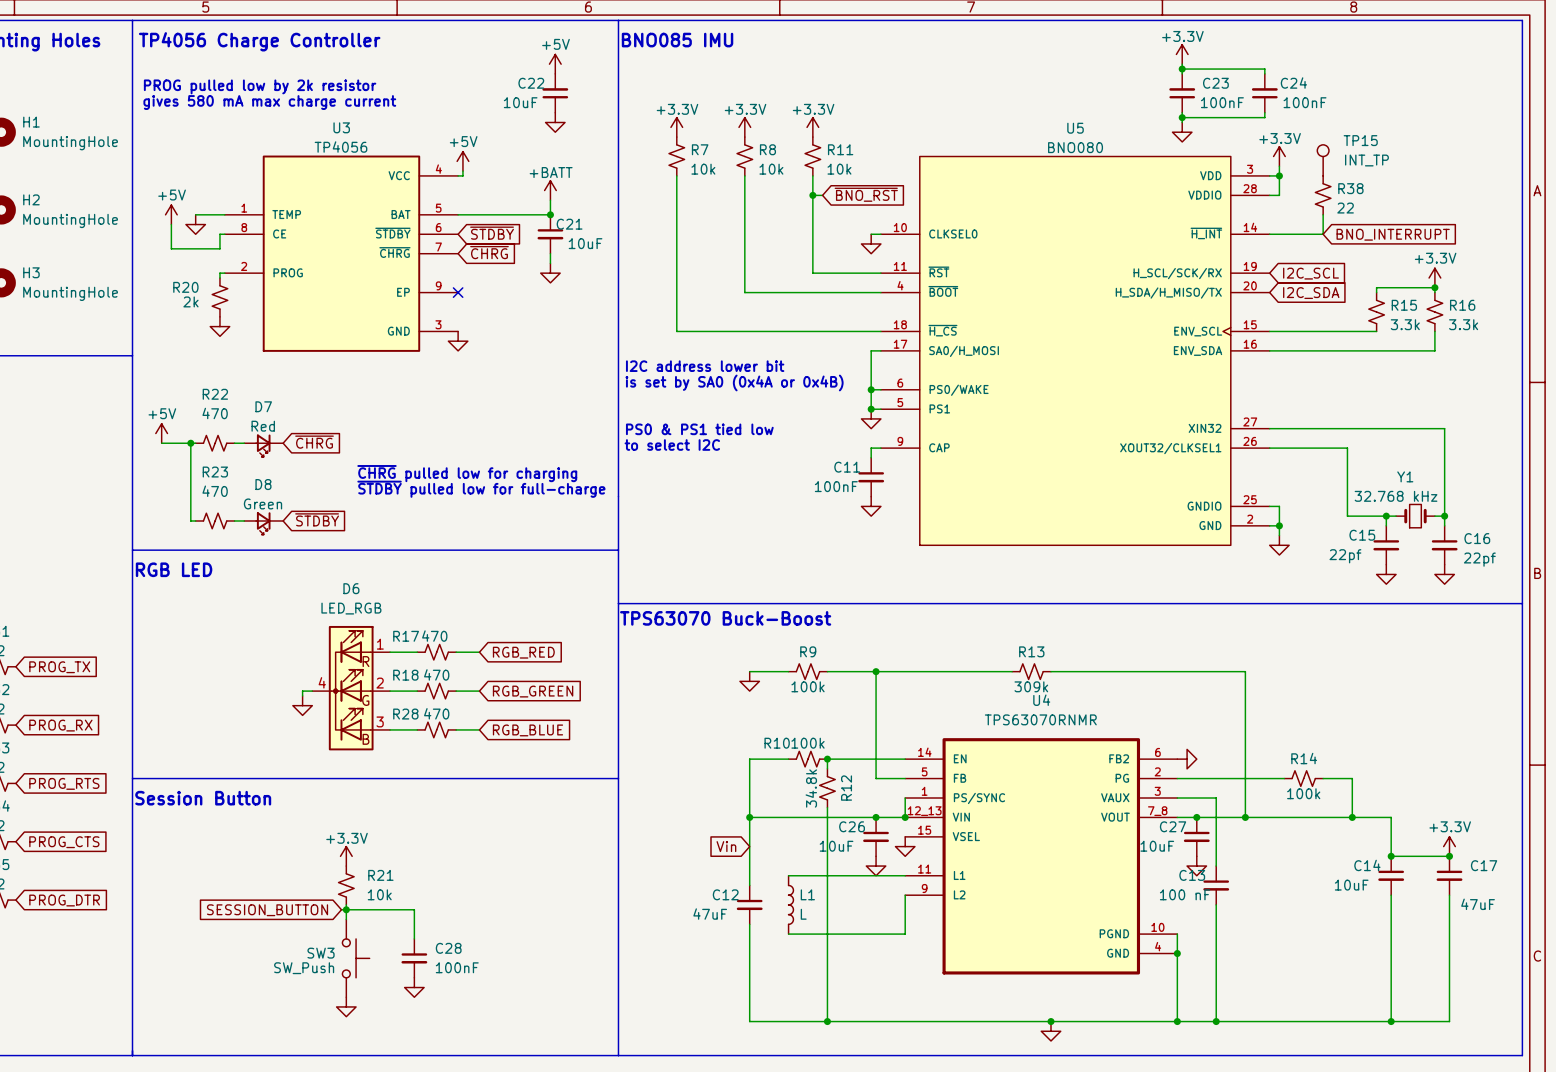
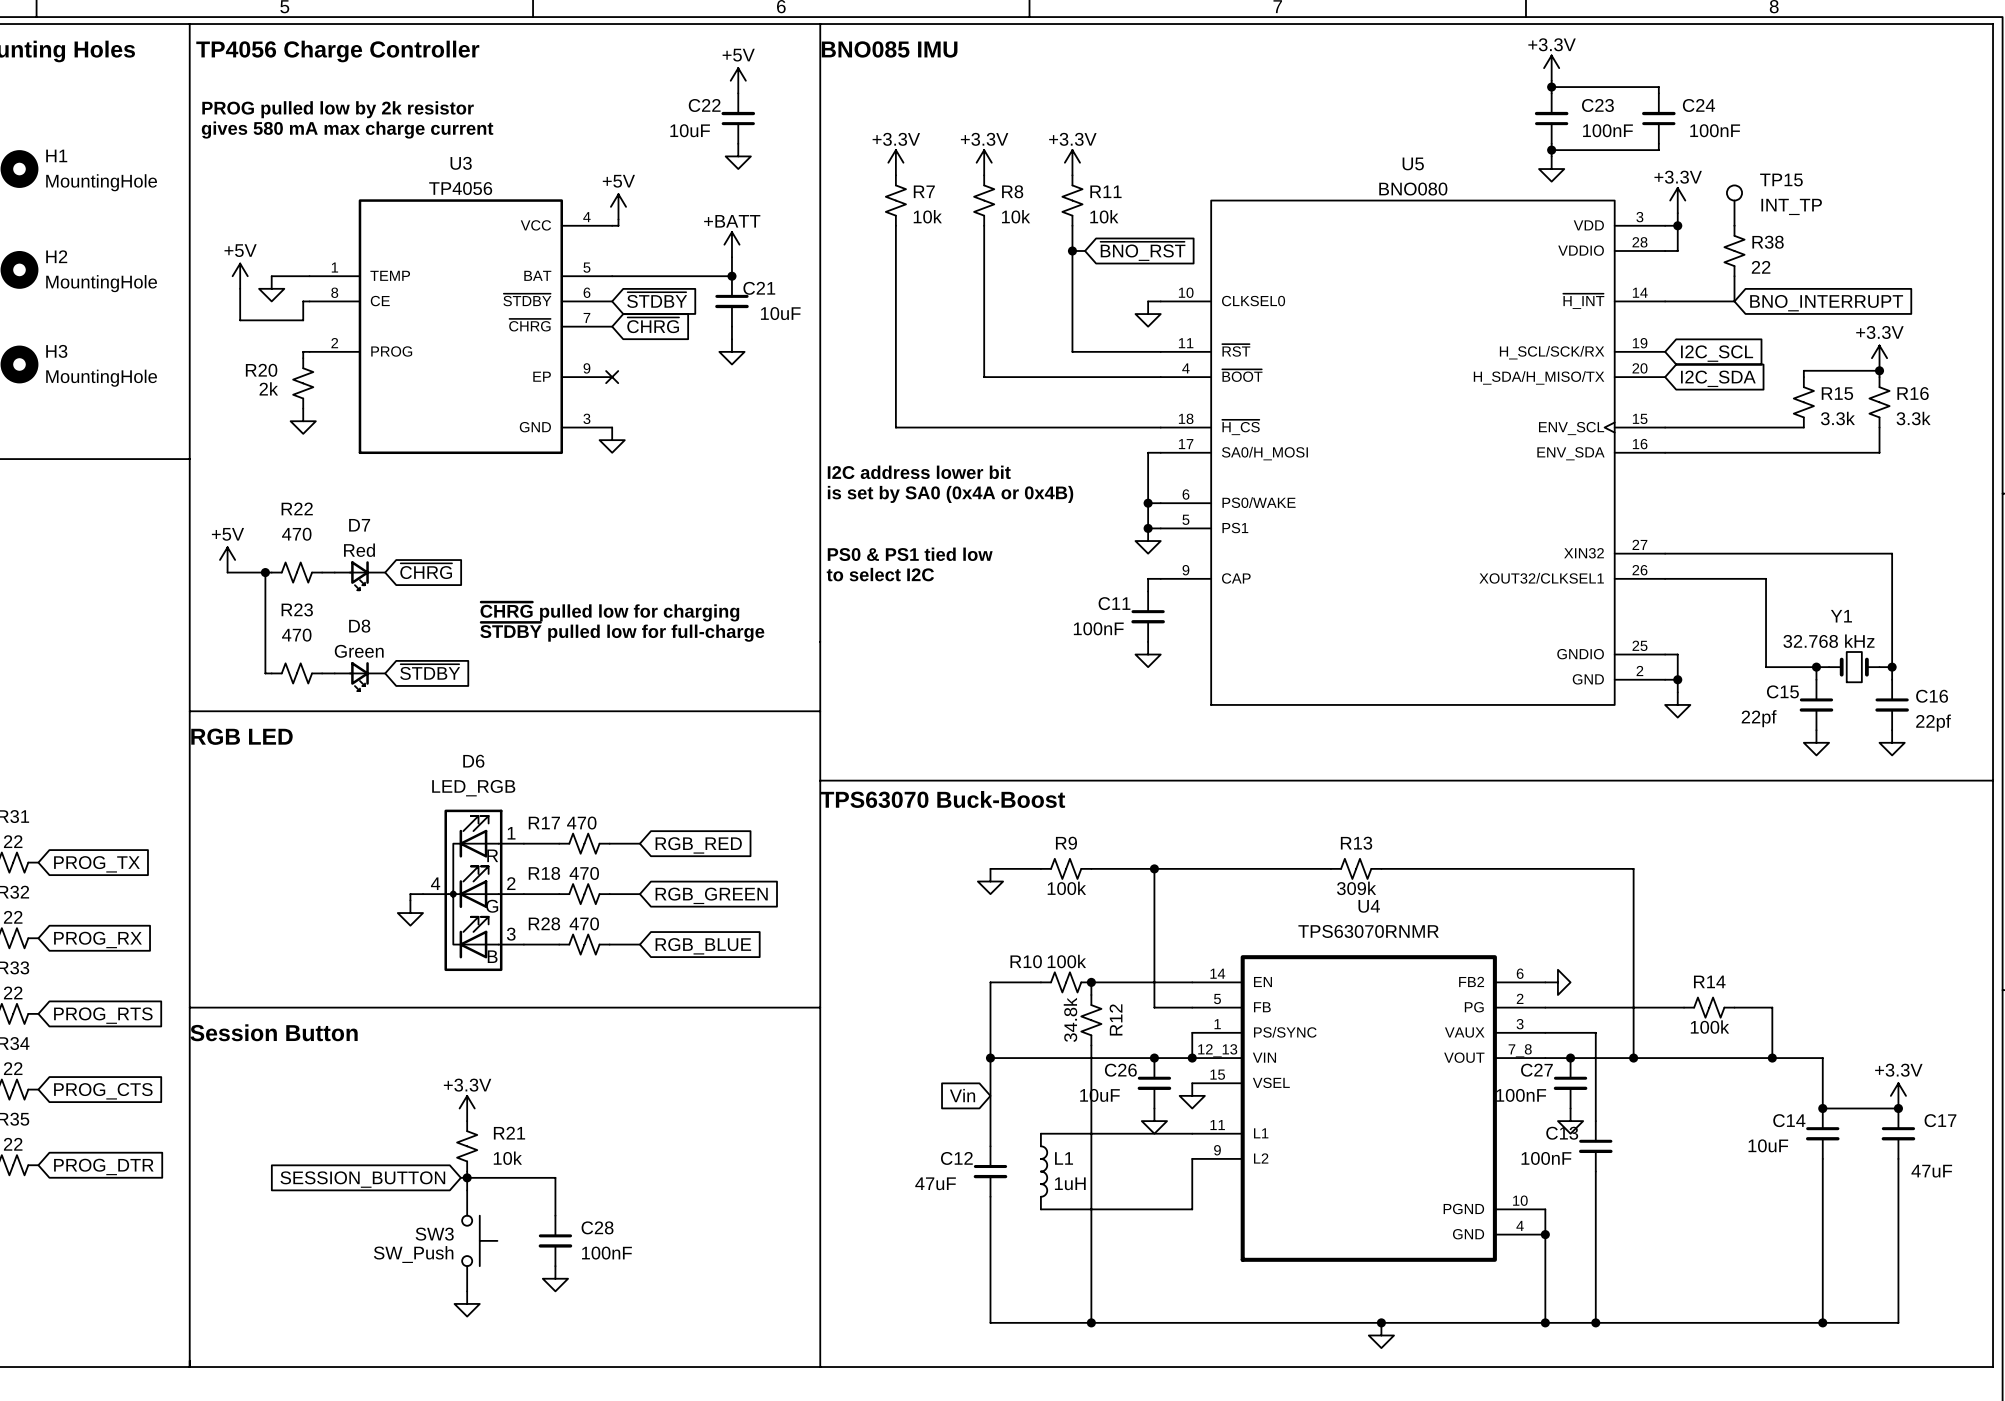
C27 value: 10uF (1157, 846) -> 100nF (1521, 1095)
C13 value: 100 nF (1185, 894) -> 100nF (1546, 1158)
L1 value: L (803, 914) -> 1uH (1070, 1183)

